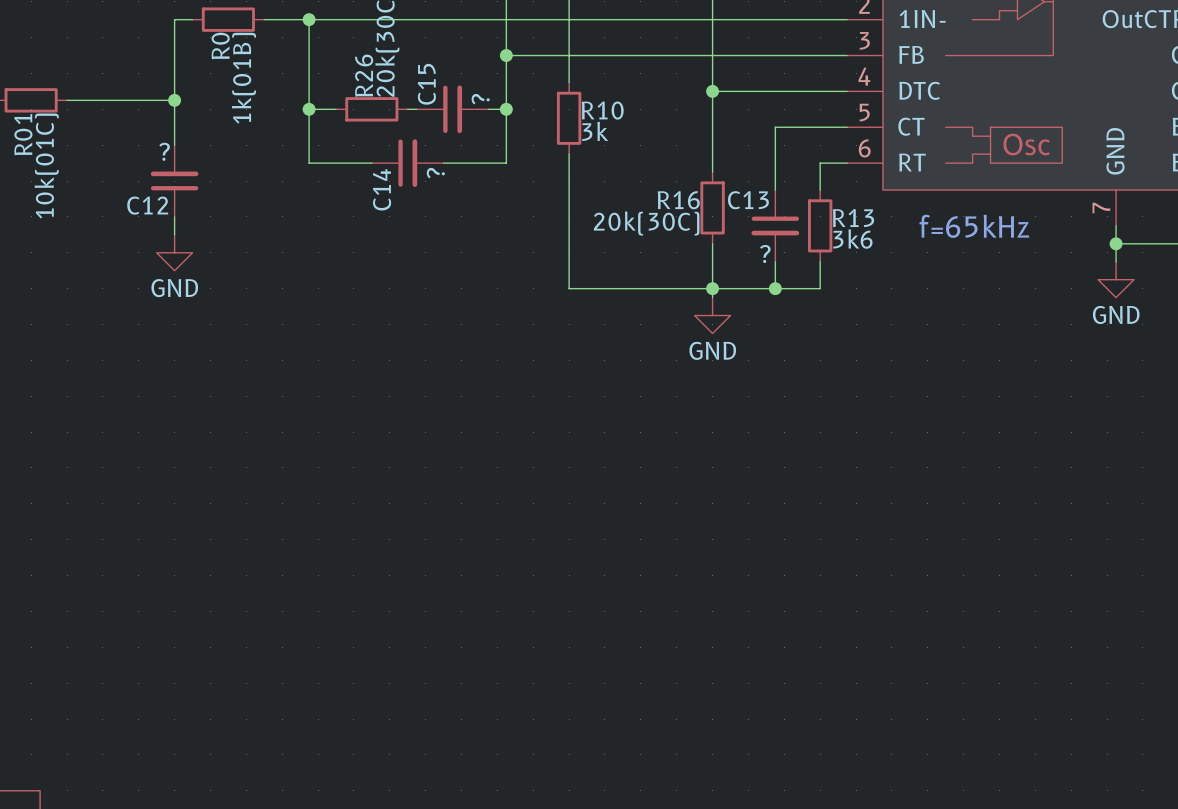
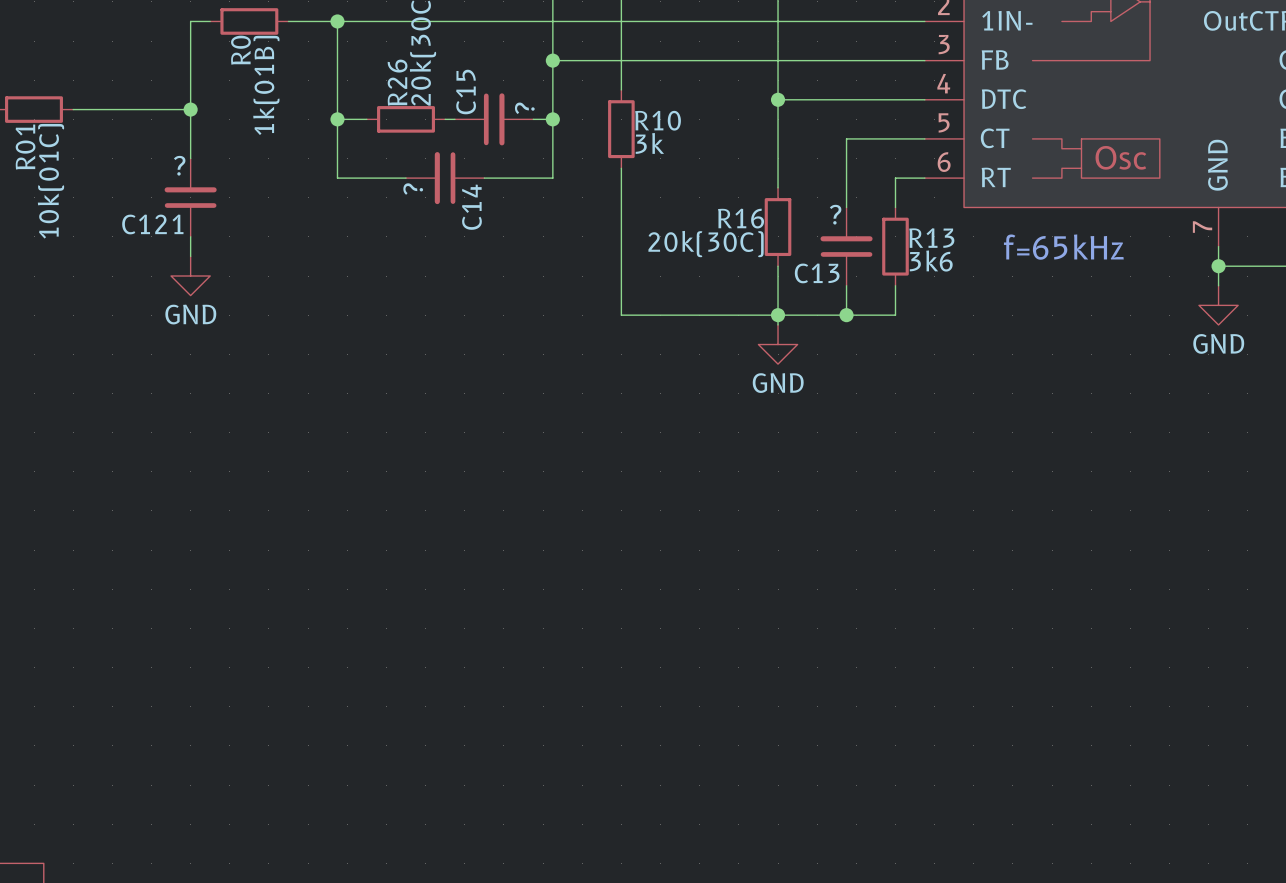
C14 rotation: 0° (407, 163) -> 180° (445, 178)
C14 value position: ? (435, 173) -> ? (413, 189)
C14 name position: C14 (382, 189) -> C14 (471, 207)
C13 name position: C13 (748, 200) -> C13 (817, 273)
C12 name: C12 (147, 205) -> C121 (152, 224)
C13 rotation: 0° (775, 225) -> 180° (846, 246)
C13 value position: ? (765, 254) -> ? (835, 214)

